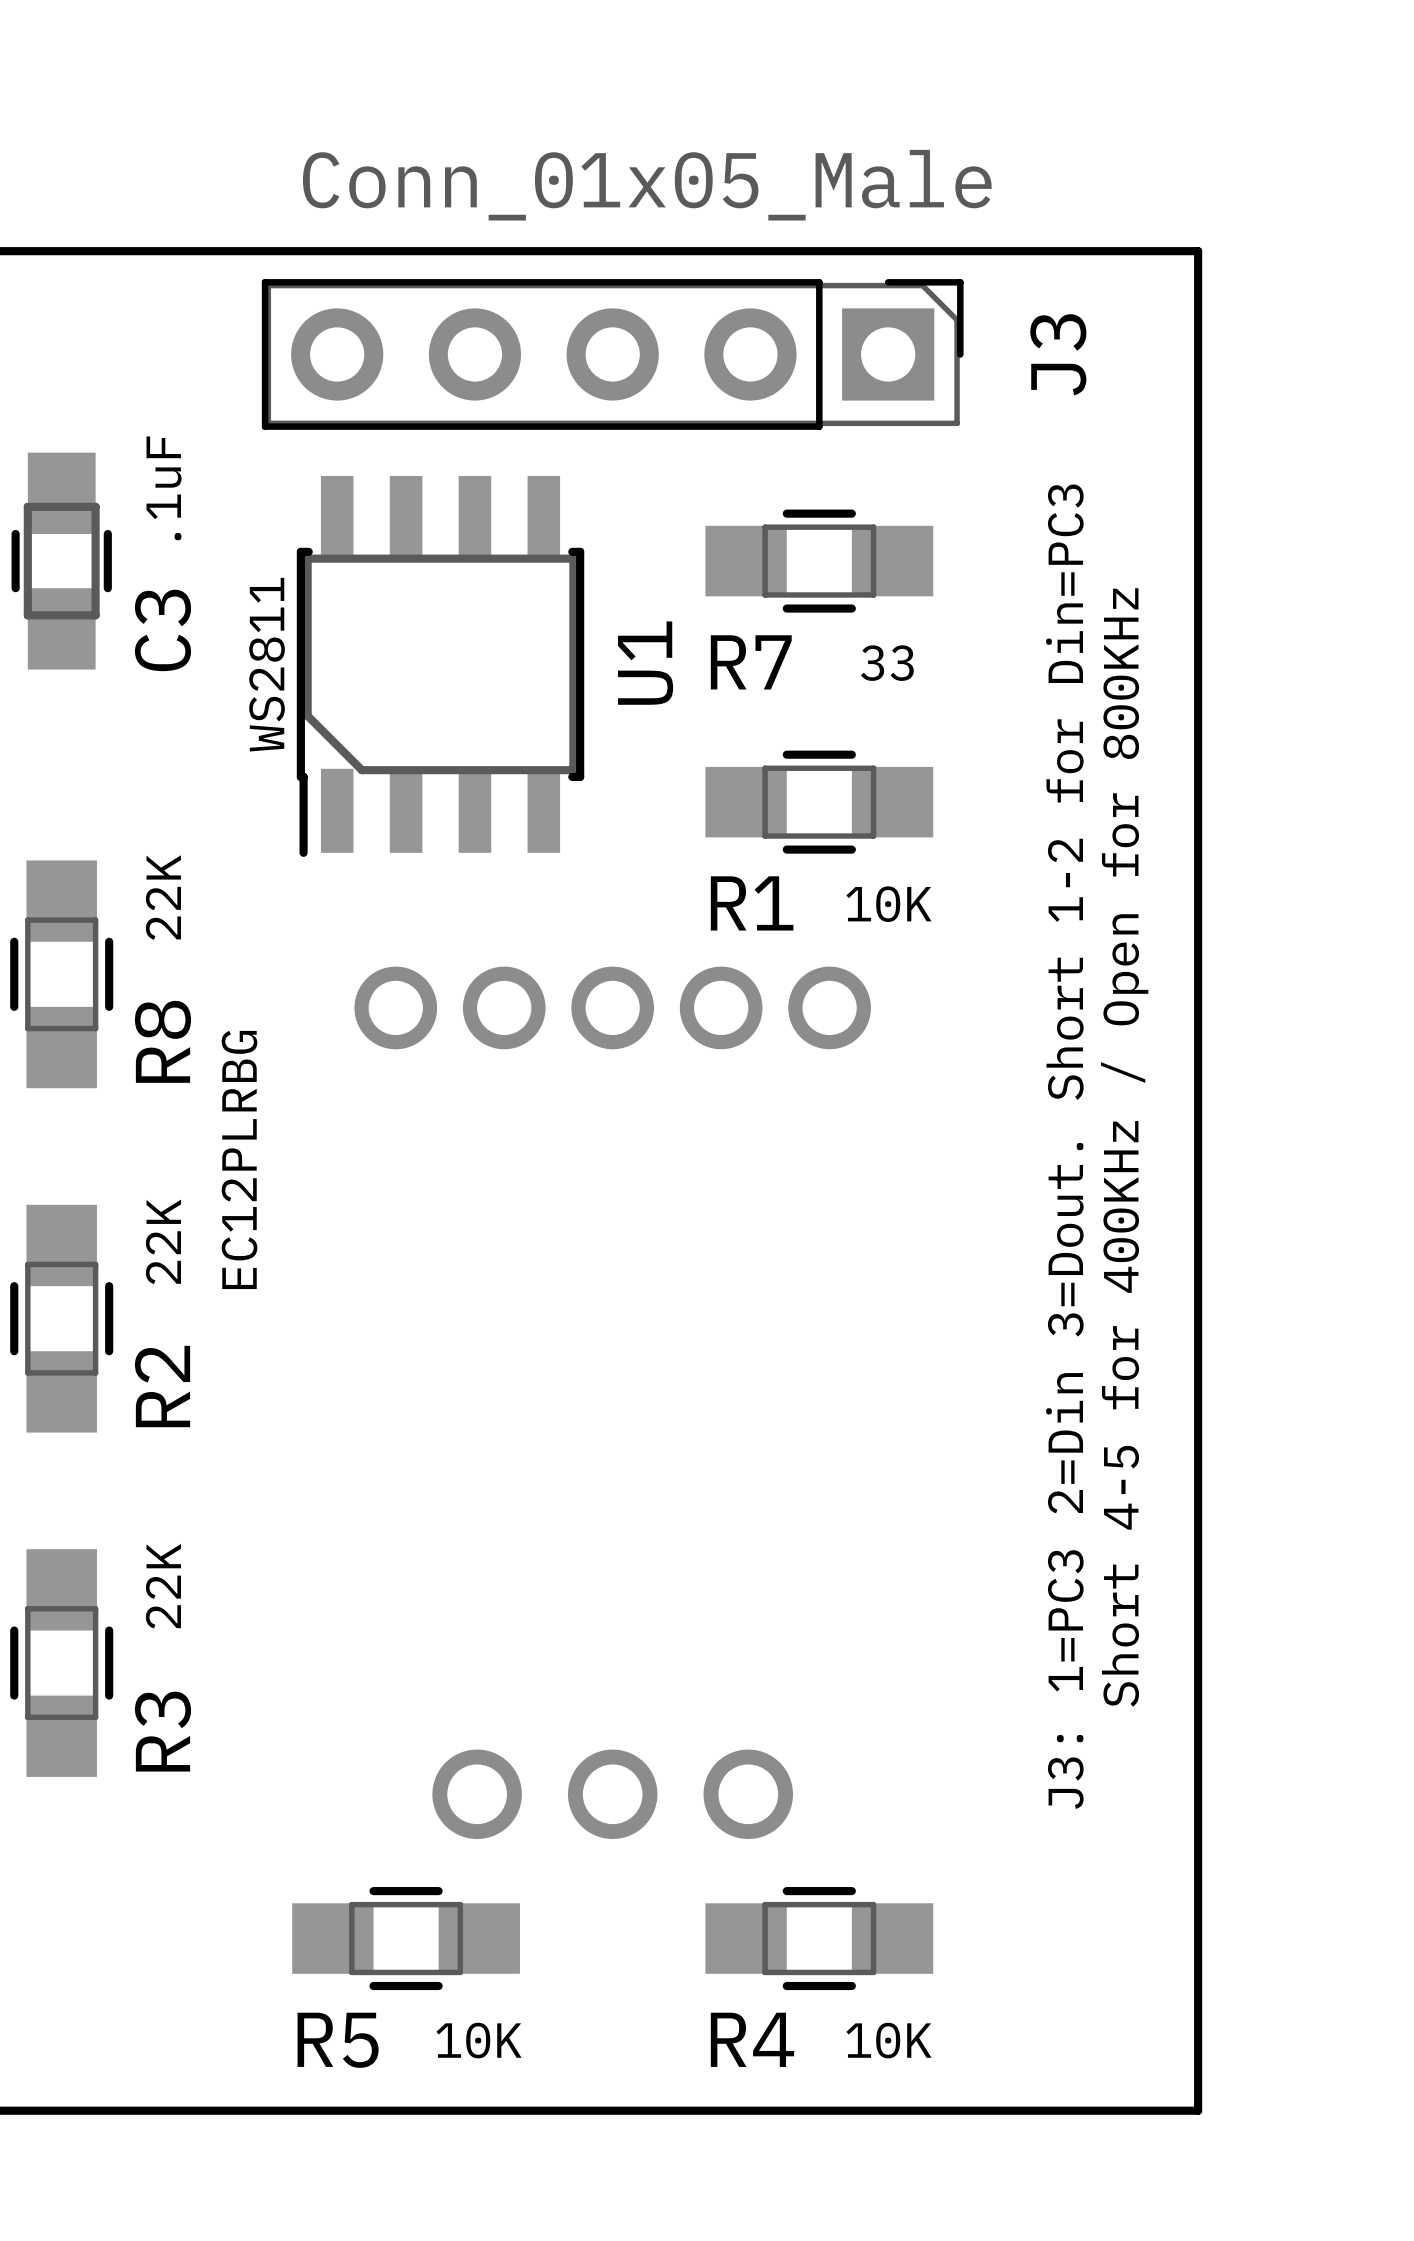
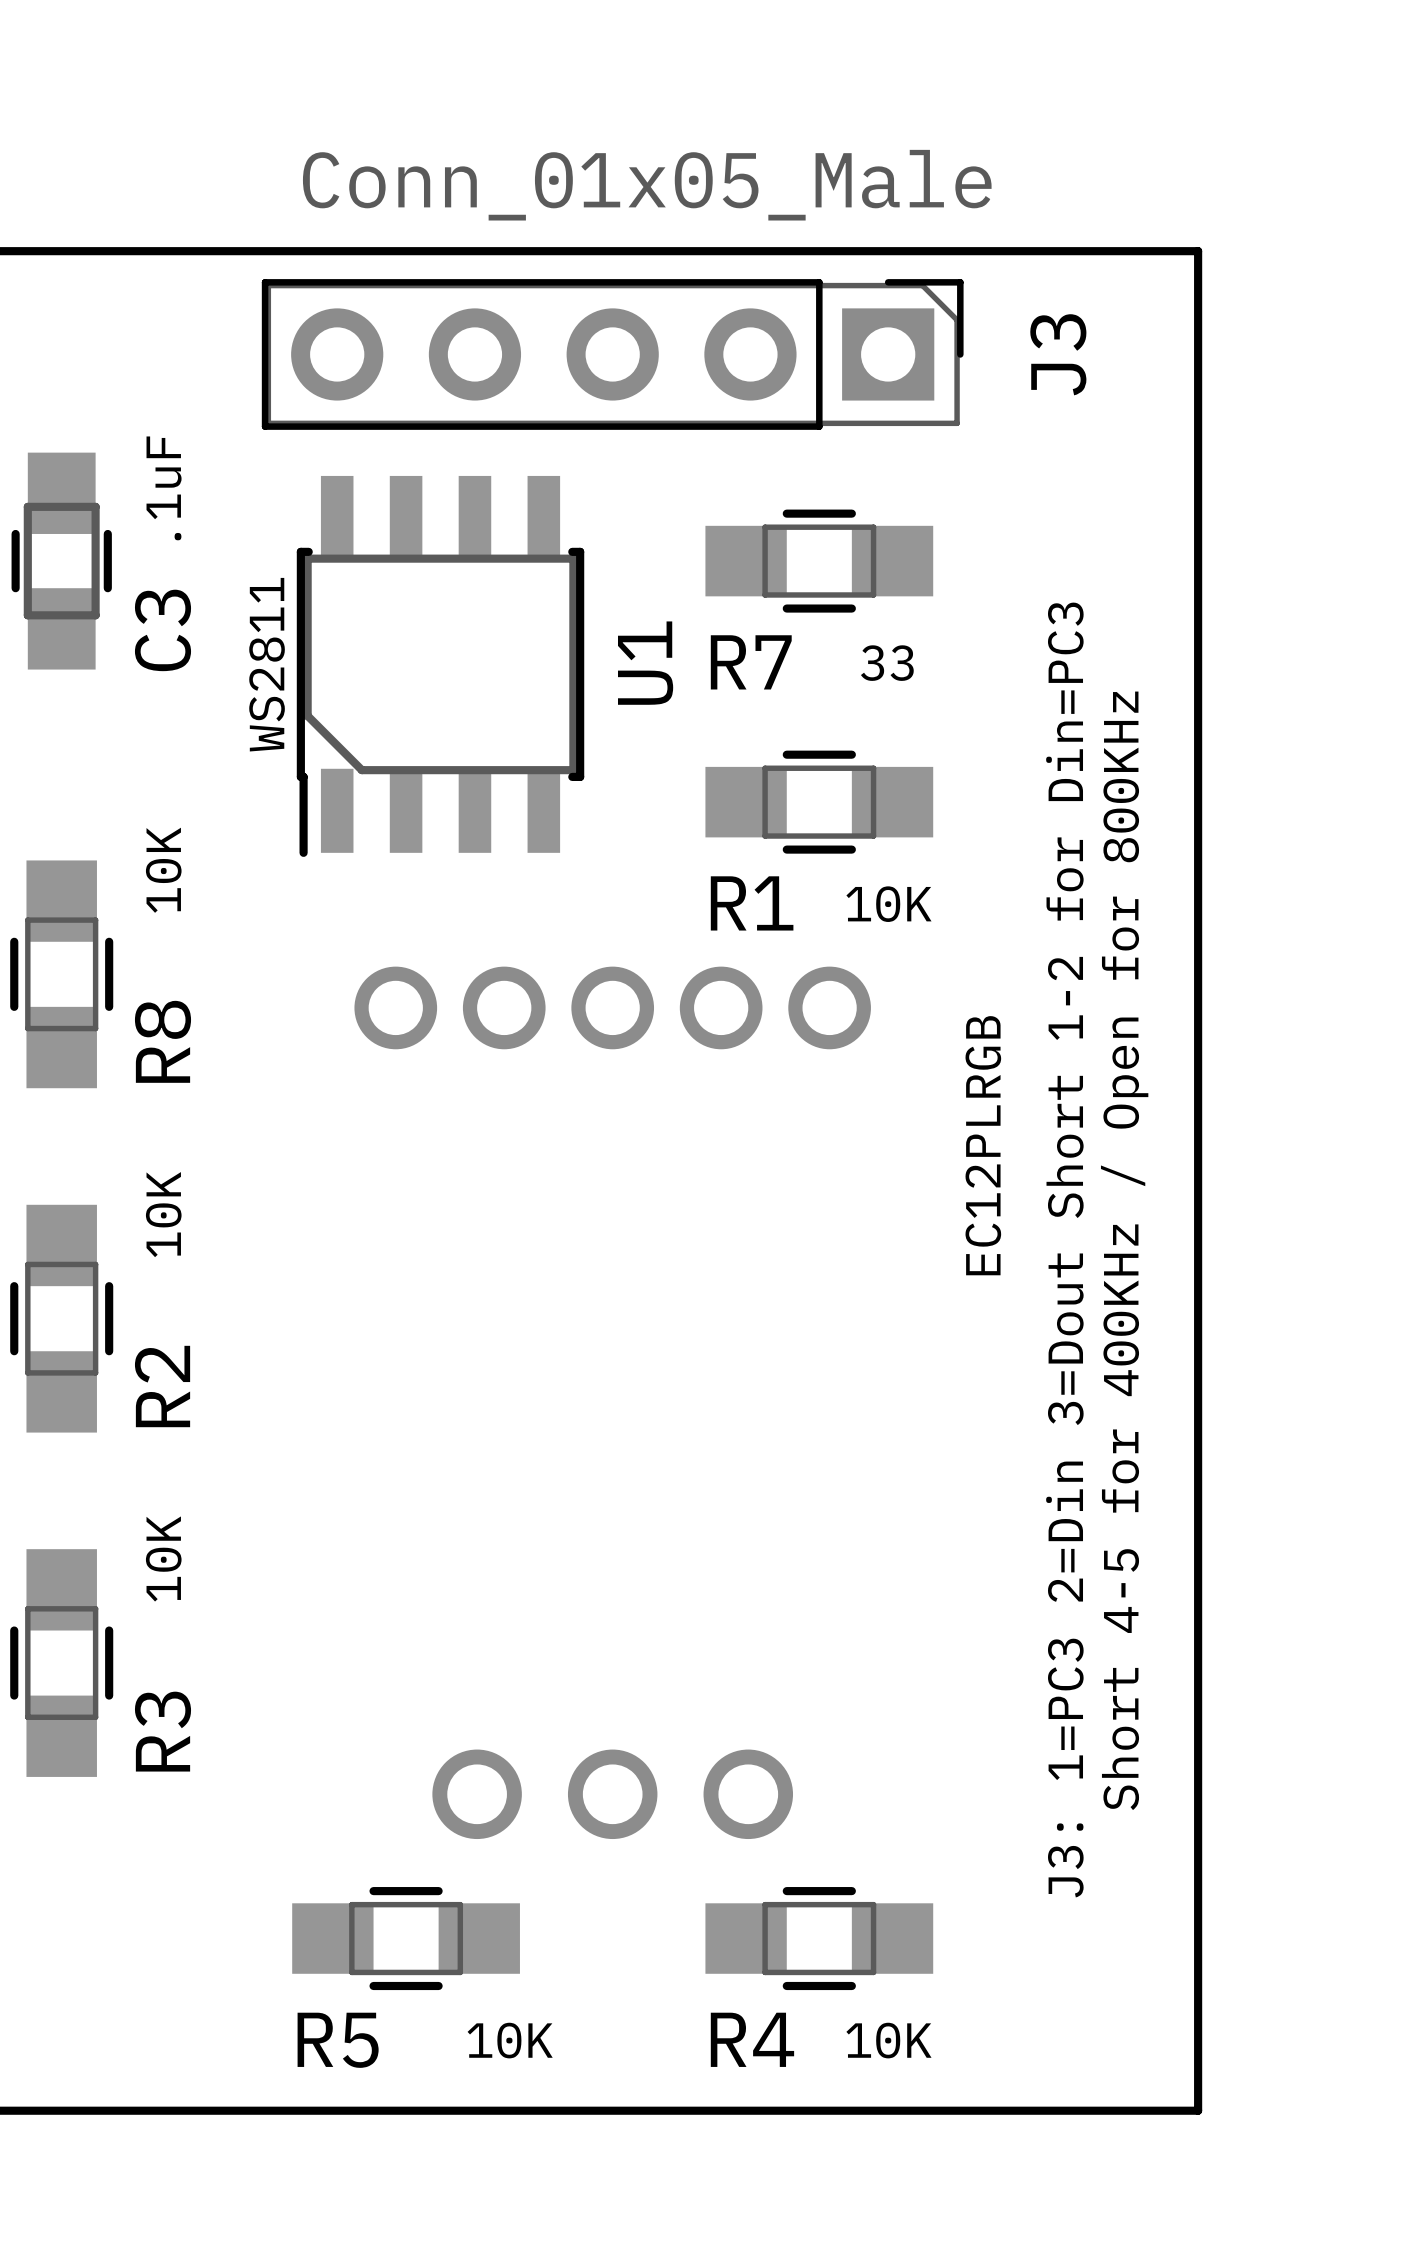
R8 value: 22K (163, 897) -> 10K (163, 870)
text: J3: 1=PC3 2=Din 3=Dout. Short 1-2 for Din=PC3 (1064, 1146) -> J3: 1=PC3 2=Din 3=Dout Short 1-2 for Din=PC3 (1064, 1250)
text position: Short 4-5 for 400KHz / Open for 800KHz (1124, 1147) -> Short 4-5 for 400KHz / Open for 800KHz (1124, 1250)
part value: EC12PLRBG (239, 1159) -> EC12PLRGB (983, 1145)
R2 value: 22K (163, 1241) -> 10K (163, 1214)
R3 value: 22K (163, 1586) -> 10K (163, 1558)
R5 value position: 10K (478, 2040) -> 10K (510, 2040)

